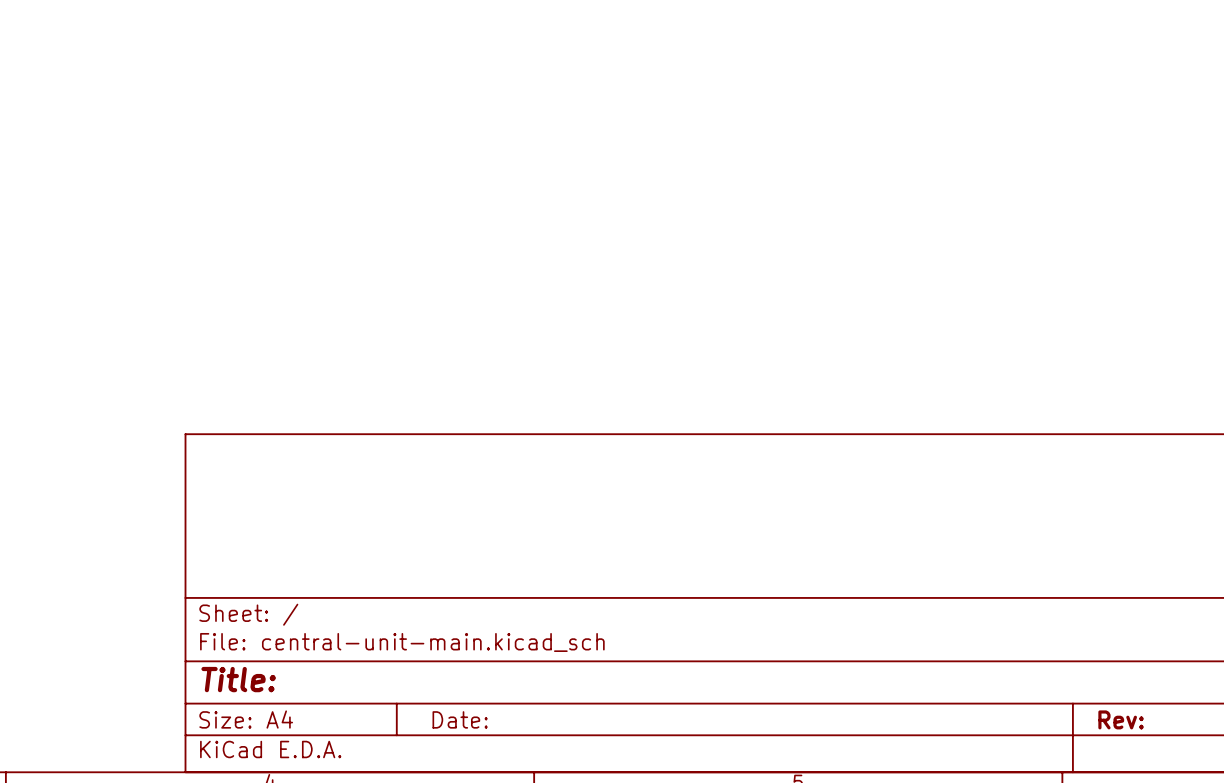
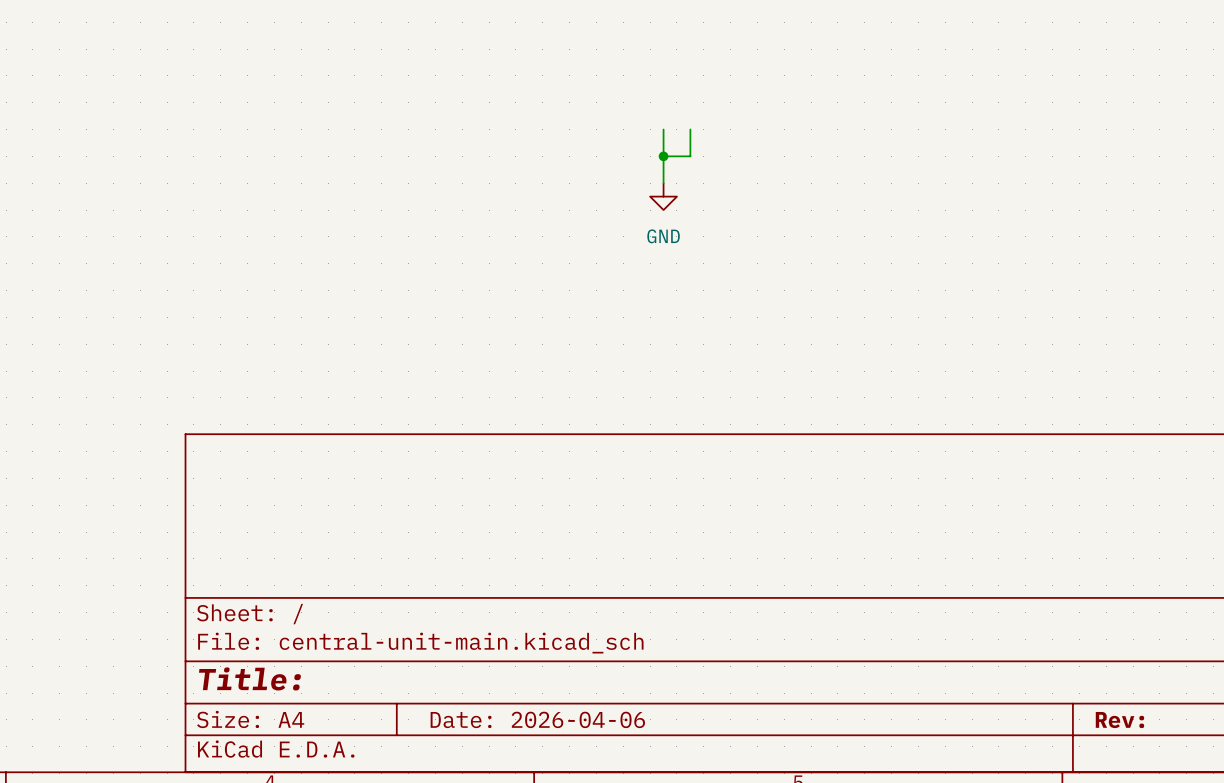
wire: none -> (663, 129) (663, 183)
wire: none -> (690, 129) (690, 156) (663, 156)
junction: none -> (663, 156)
power symbol: none -> GND (663, 196)
title block: Date: (460, 719) -> Date: 2026-04-06 (537, 719)

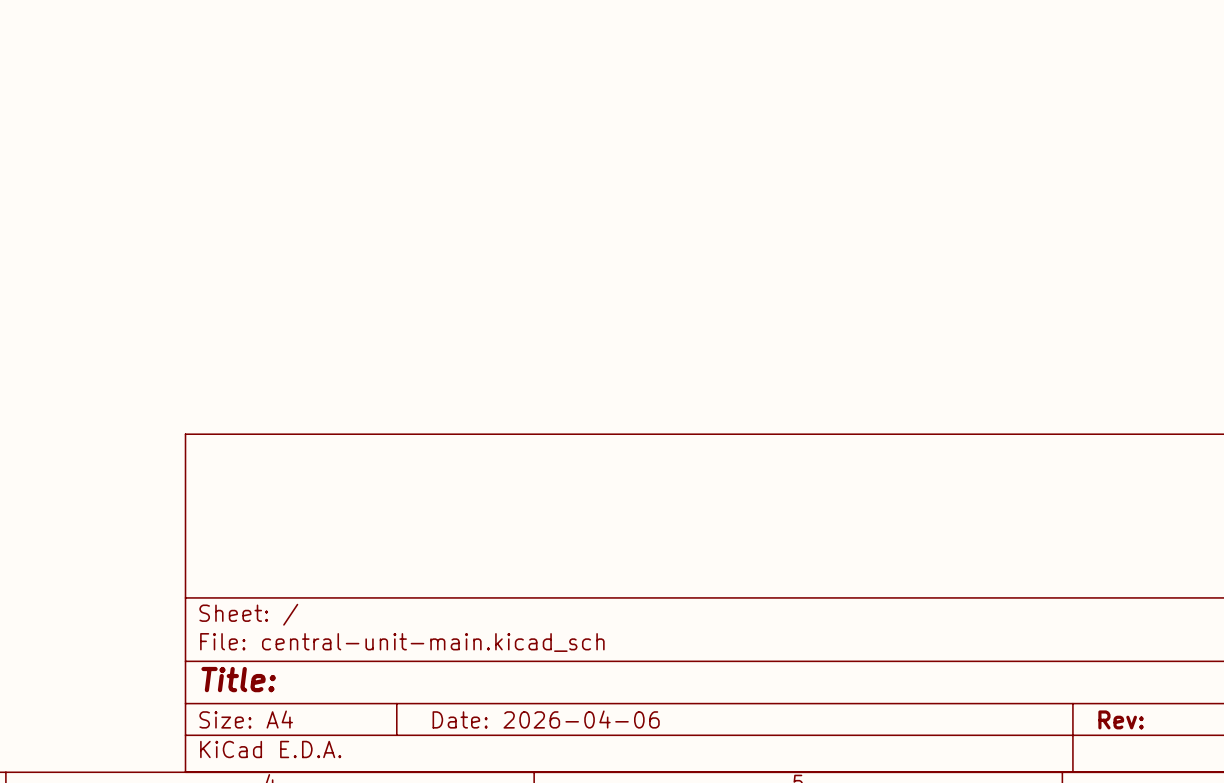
wire: (663, 129) (663, 183) -> none
wire: (690, 129) (690, 156) (663, 156) -> none
junction: (663, 156) -> none
power symbol: GND (663, 196) -> none

